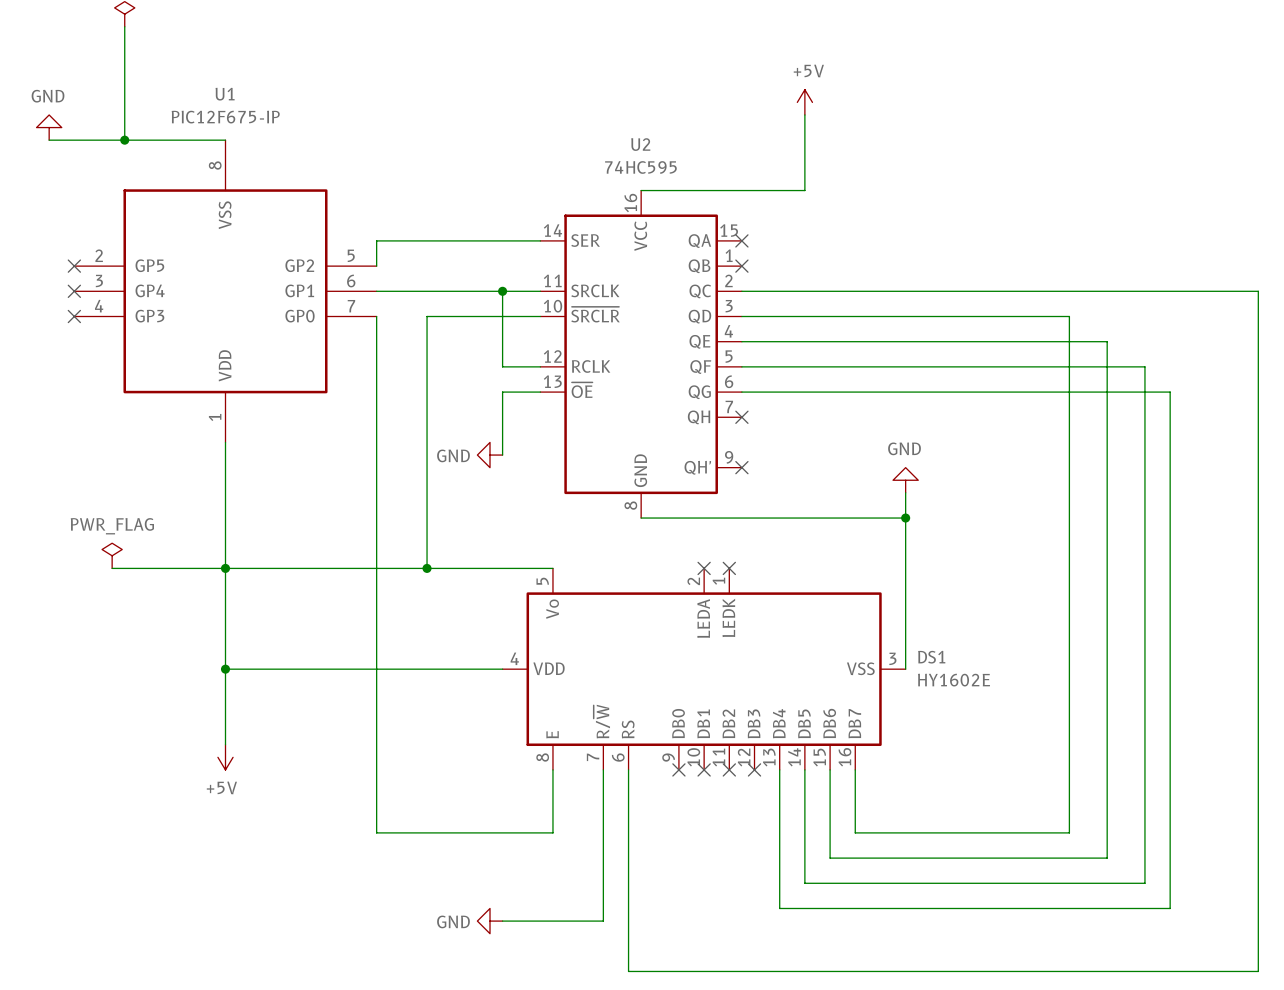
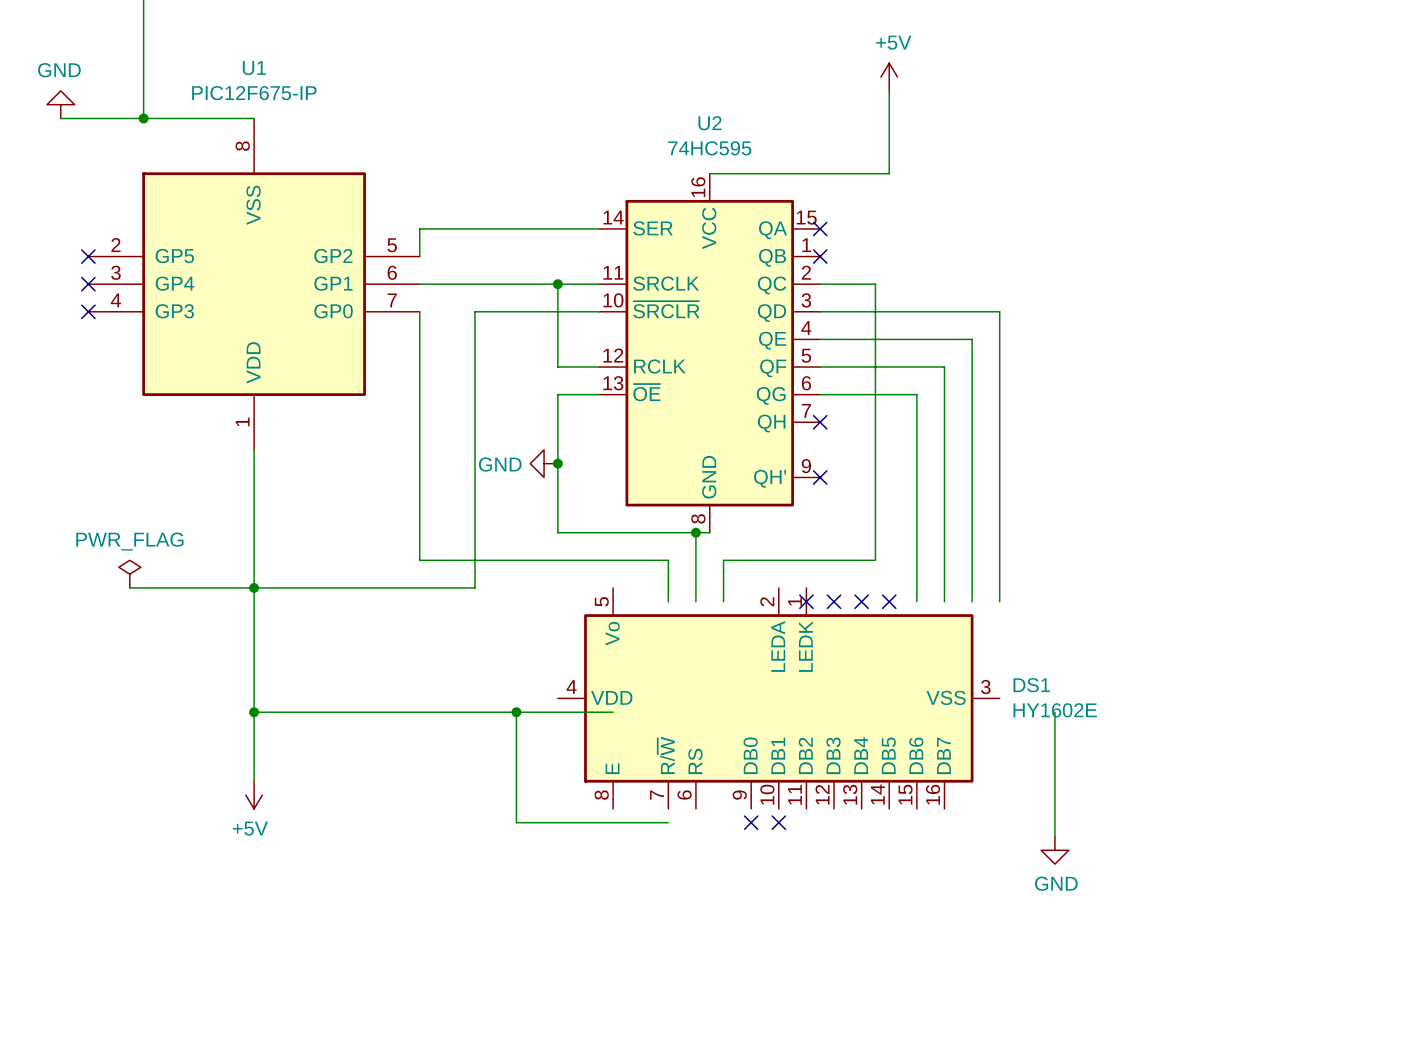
wire: (792, 291) (1258, 291) (1258, 971) (628, 971) (628, 769) -> (875, 284) (875, 560) (723, 560) (723, 601)
wire: (905, 316) (1069, 316) (1069, 832) (855, 832) (855, 769) -> (999, 311) (999, 505)
wire: (880, 341) (1107, 341) (1107, 858) (830, 858) (830, 769) -> (972, 339) (972, 601)
wire: (855, 366) (1144, 366) (1144, 883) (804, 883) (804, 769) -> (944, 367) (944, 601)
wire: (830, 392) (1170, 392) (1170, 908) (779, 908) (779, 769) -> (916, 394) (916, 601)
junction: none -> (557, 463)
power symbol: GND (905, 480) -> none
wire: none -> (695, 532) (695, 601)
junction: none -> (695, 532)
wire: (641, 518) (905, 518) -> (709, 532) (557, 532) (557, 463)
junction: (905, 518) -> none
wire: (376, 543) (376, 832) (552, 832) (552, 769) -> (419, 560) (668, 560) (668, 601)
wire: (427, 568) (552, 568) -> none
junction: (427, 568) -> none
no-connect mark: (704, 568) -> none
no-connect mark position: (729, 568) -> (806, 601)
no-connect mark: none -> (834, 601)
no-connect mark: none -> (861, 601)
no-connect mark: none -> (889, 601)
wire: (905, 581) (905, 669) -> none
wire: (225, 669) (502, 669) -> none
junction position: (225, 669) -> (254, 712)
wire: none -> (254, 712) (613, 712)
wire: none -> (516, 712) (516, 822) (668, 822)
junction: none -> (516, 712)
wire: none -> (1054, 712) (1054, 836)
wire: (603, 769) (603, 921) (502, 921) -> none
no-connect mark position: (678, 769) -> (751, 822)
no-connect mark position: (704, 769) -> (778, 822)
no-connect mark: (729, 769) -> none
no-connect mark: (754, 769) -> none
power symbol: none -> GND (1054, 850)
power symbol: GND (490, 921) -> none

